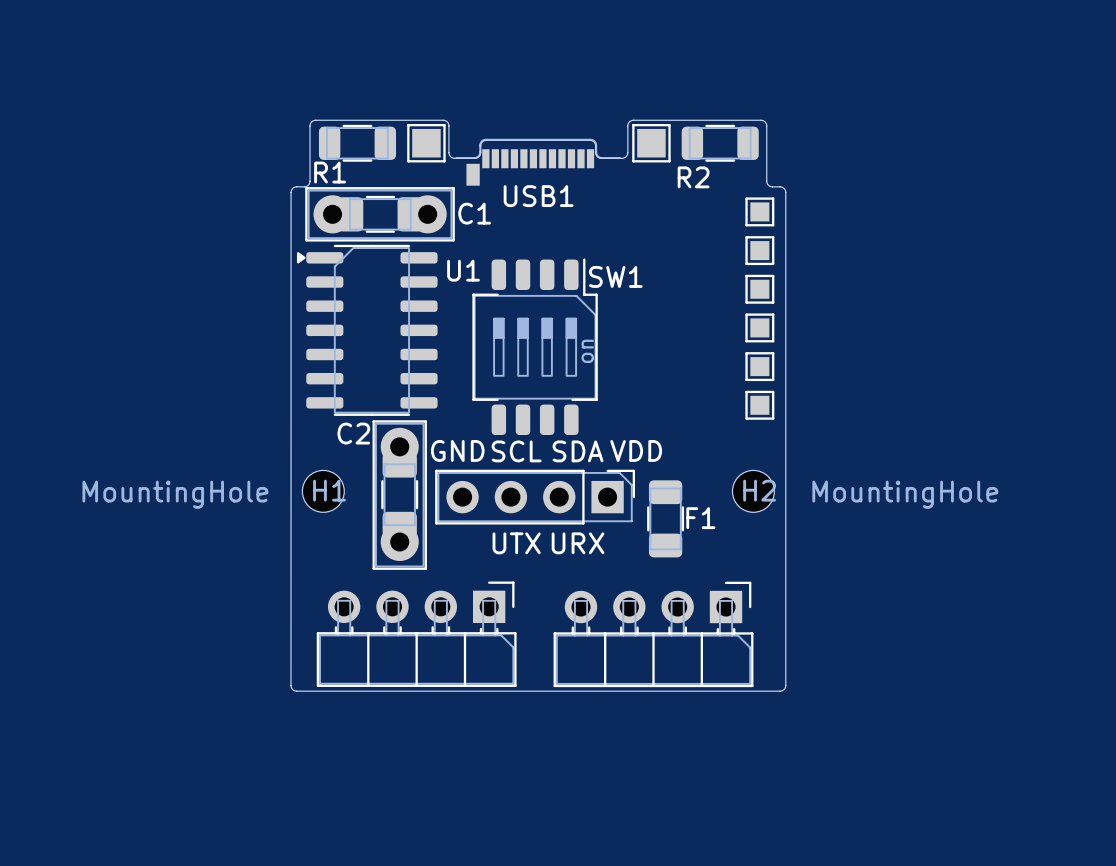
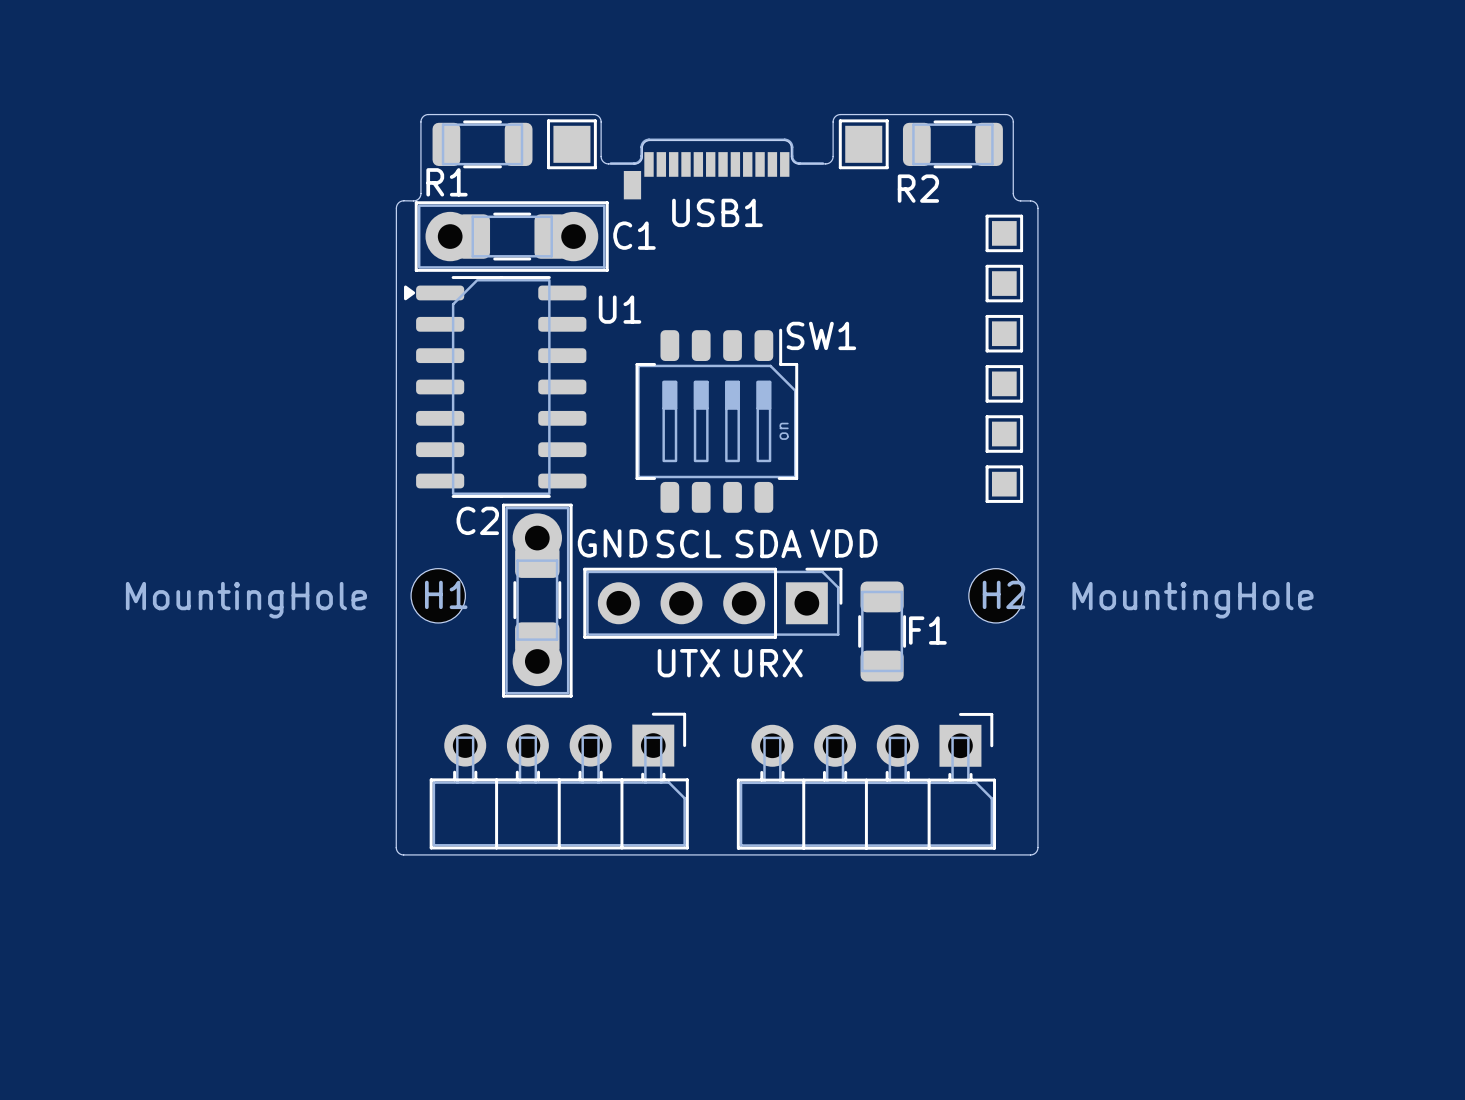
SW1 footprint: [472, 258, 598, 435] -> [635, 328, 799, 513]

